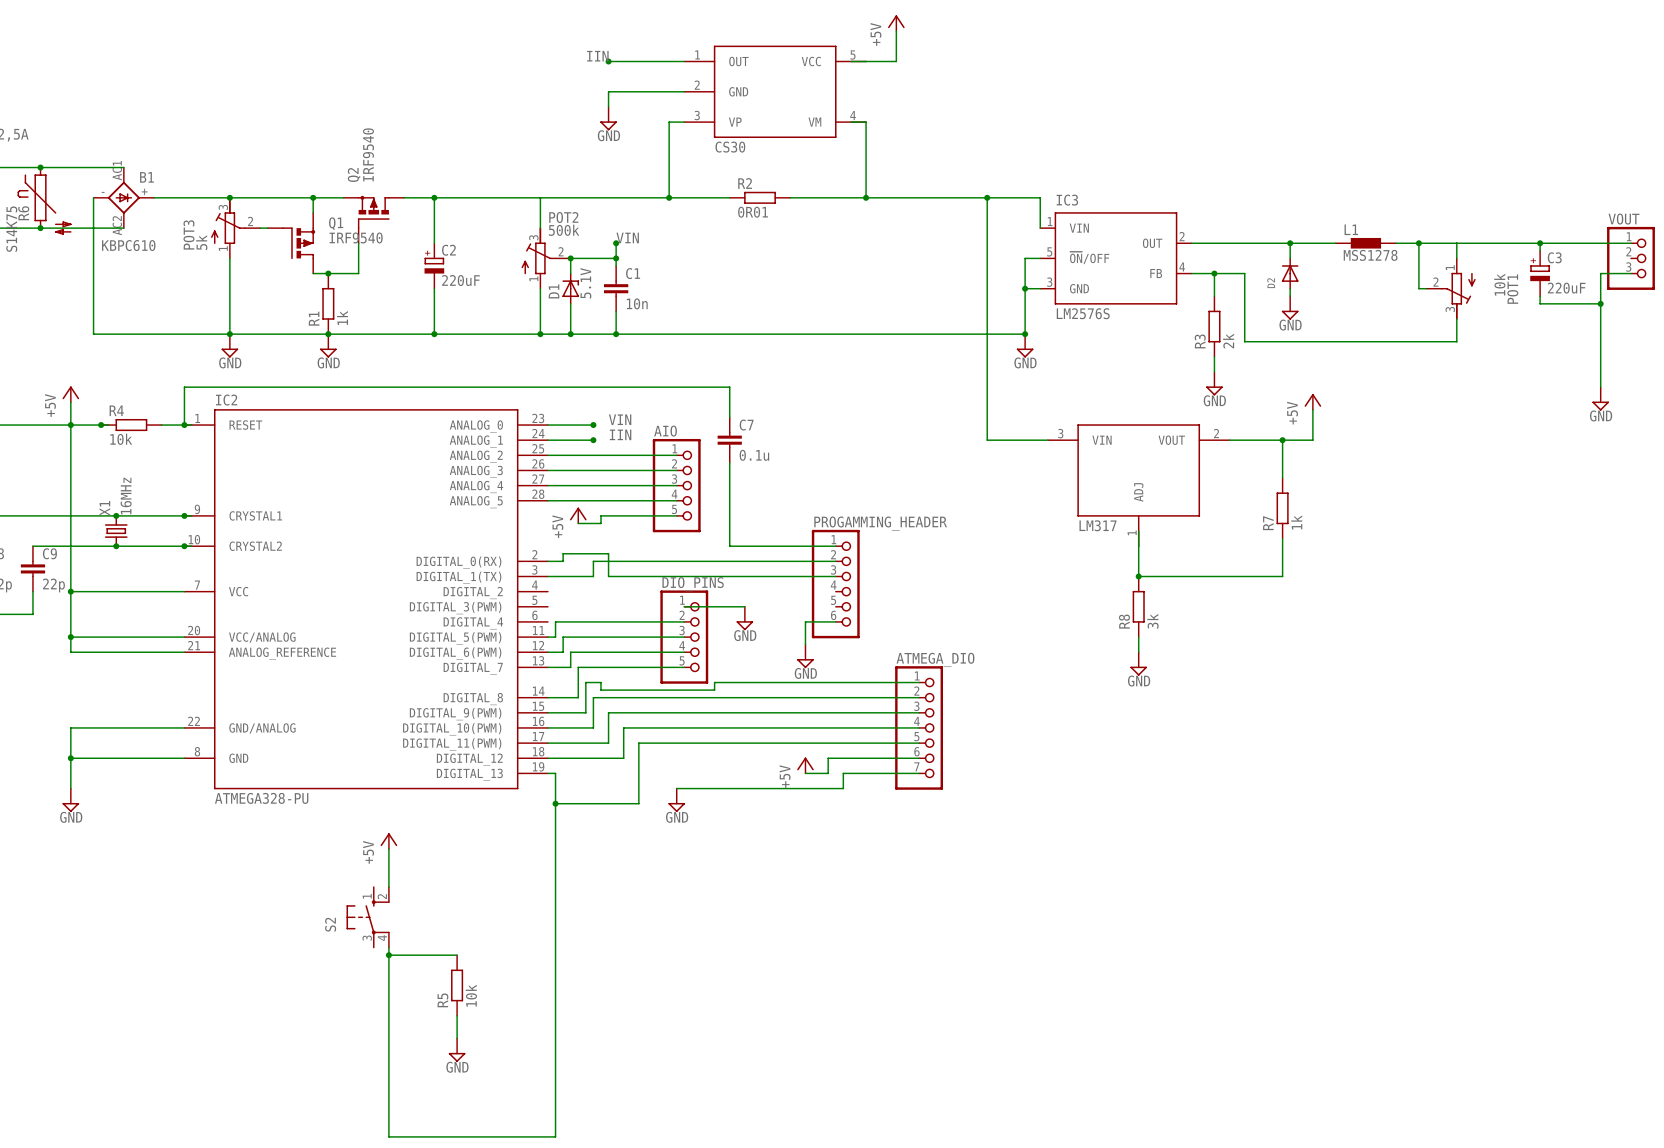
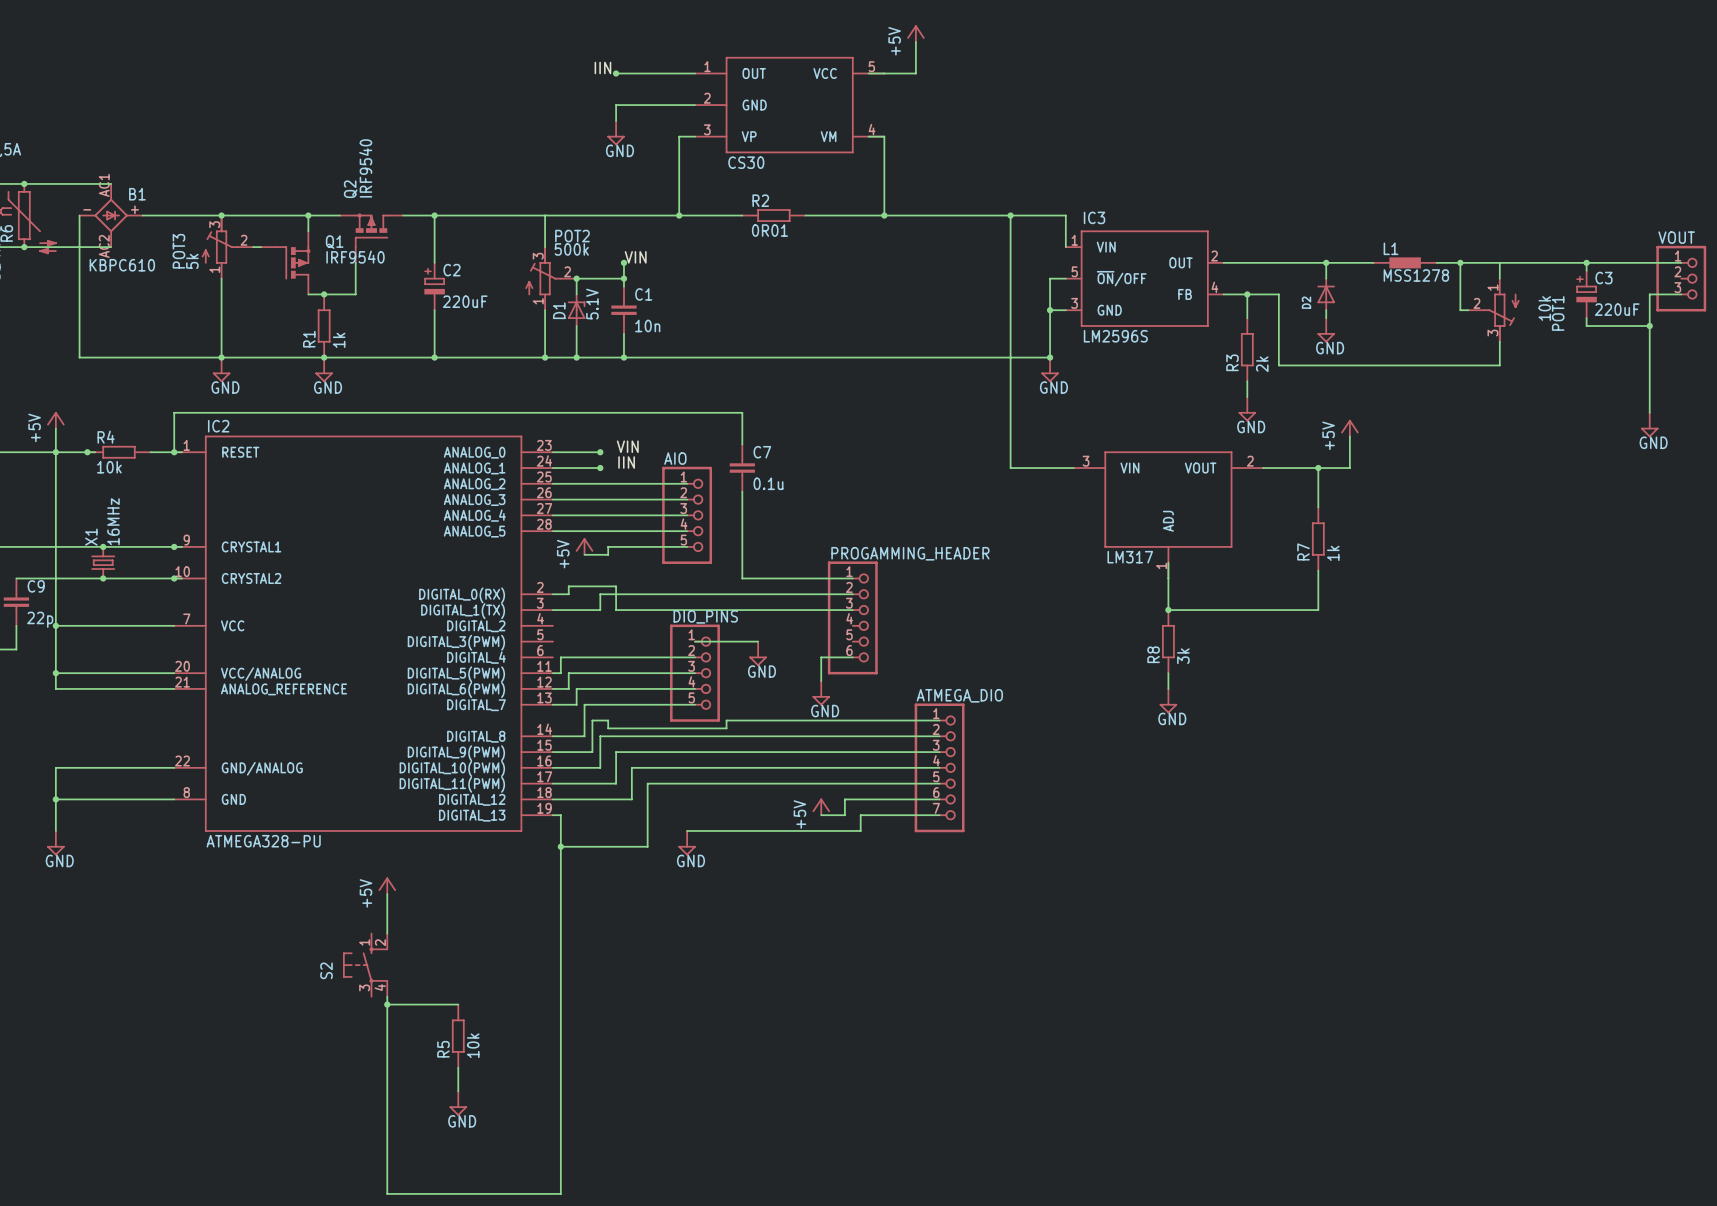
IC3 value: LM2576S (1083, 313) -> LM2596S (1115, 336)

